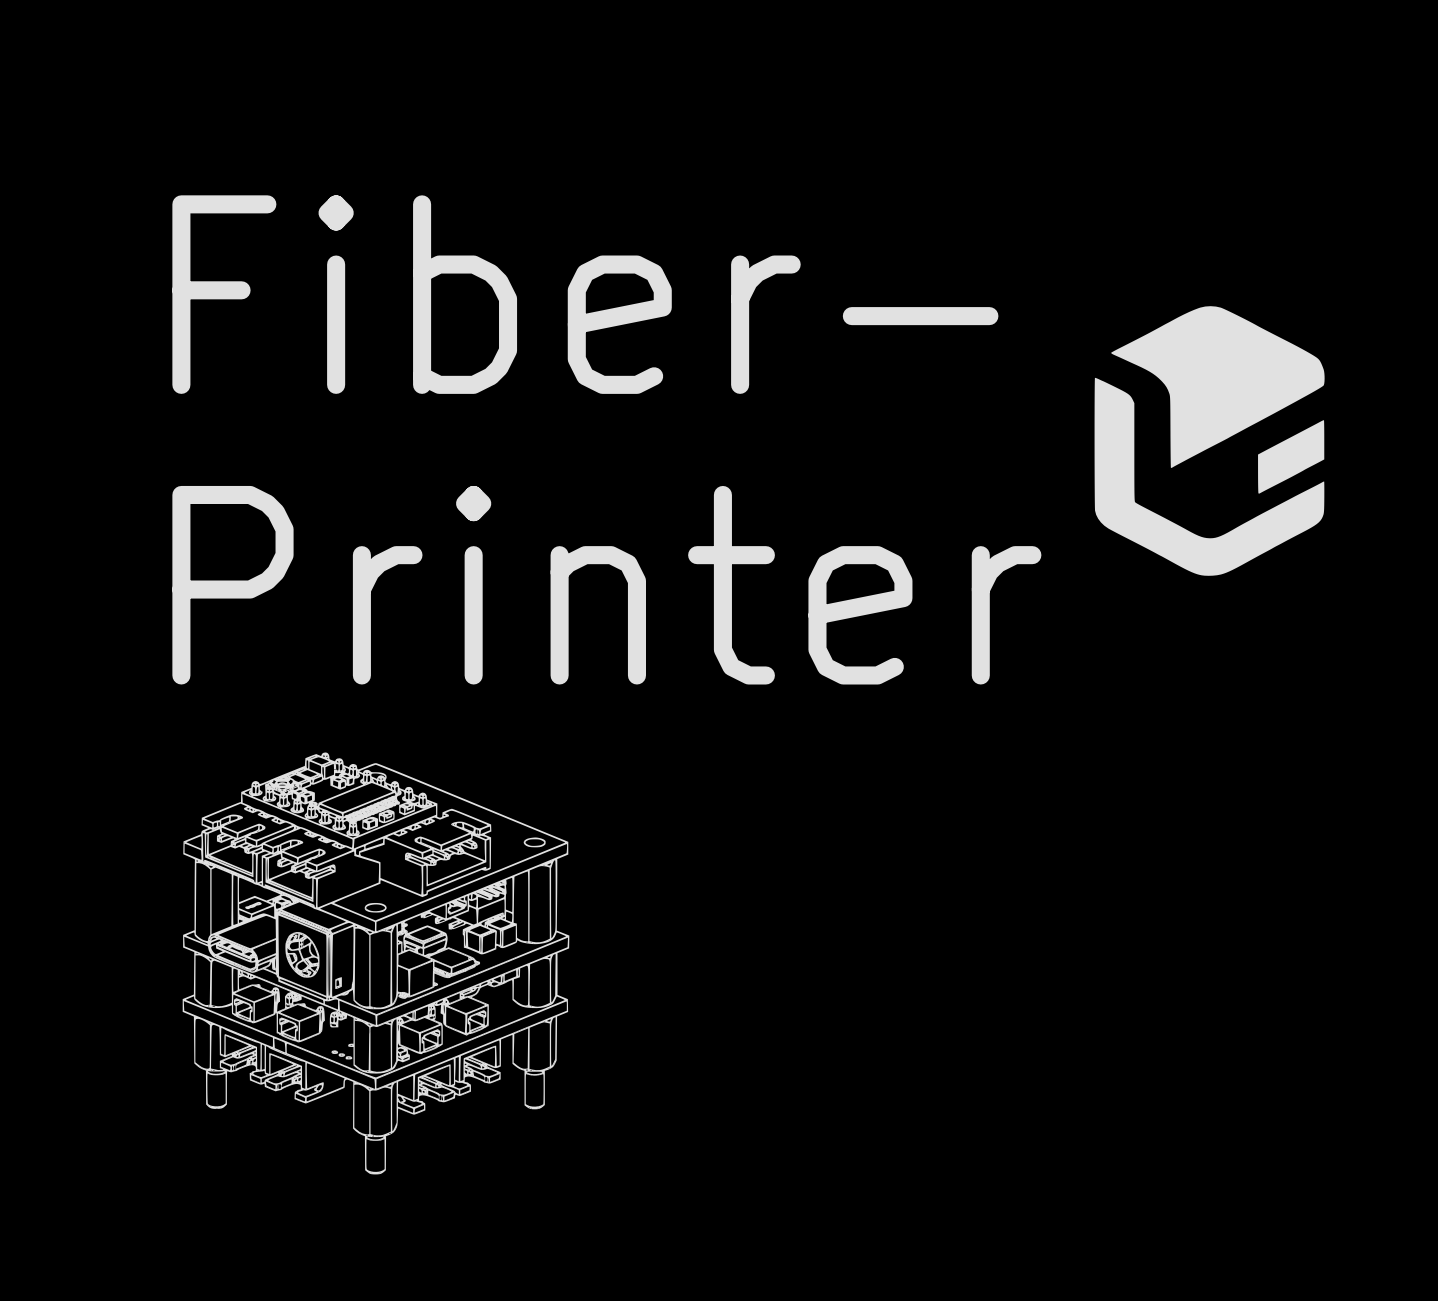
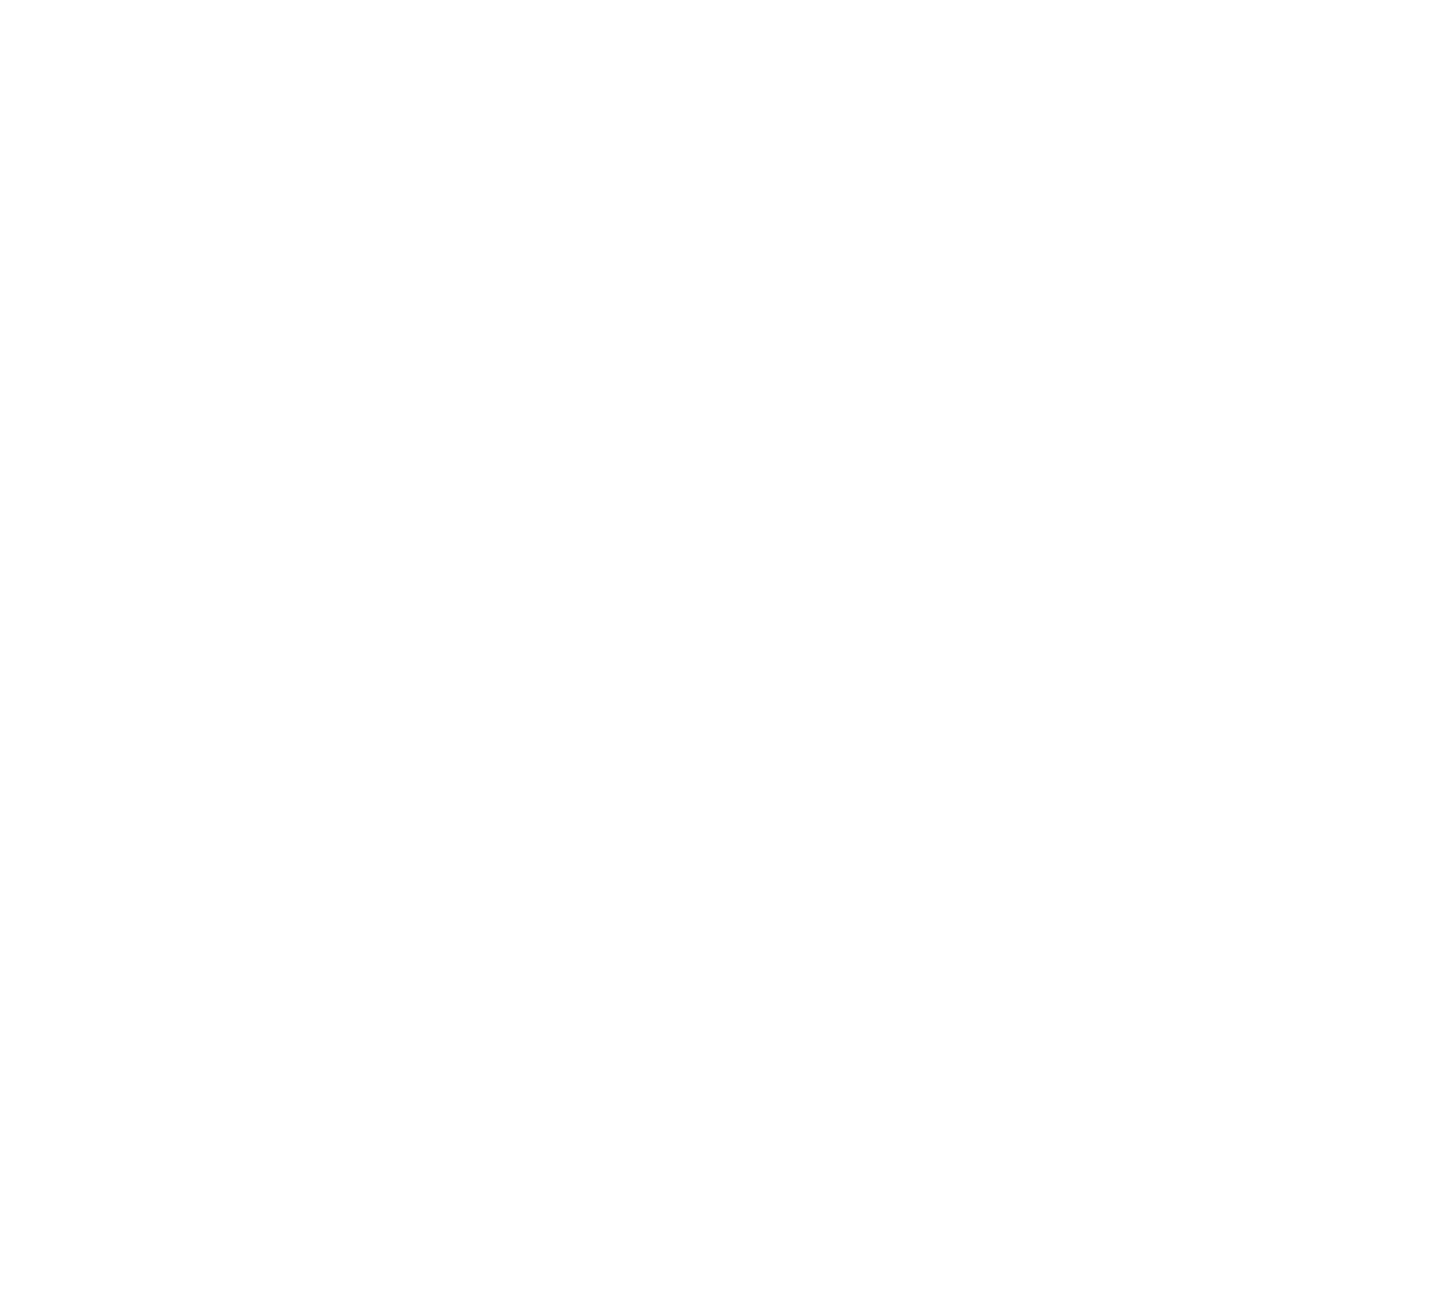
text: Fiber- (585, 294) -> none
drawing: [1094, 306, 1325, 576] -> none
text: Printer (606, 585) -> none
drawing: [182, 752, 570, 1175] -> none

